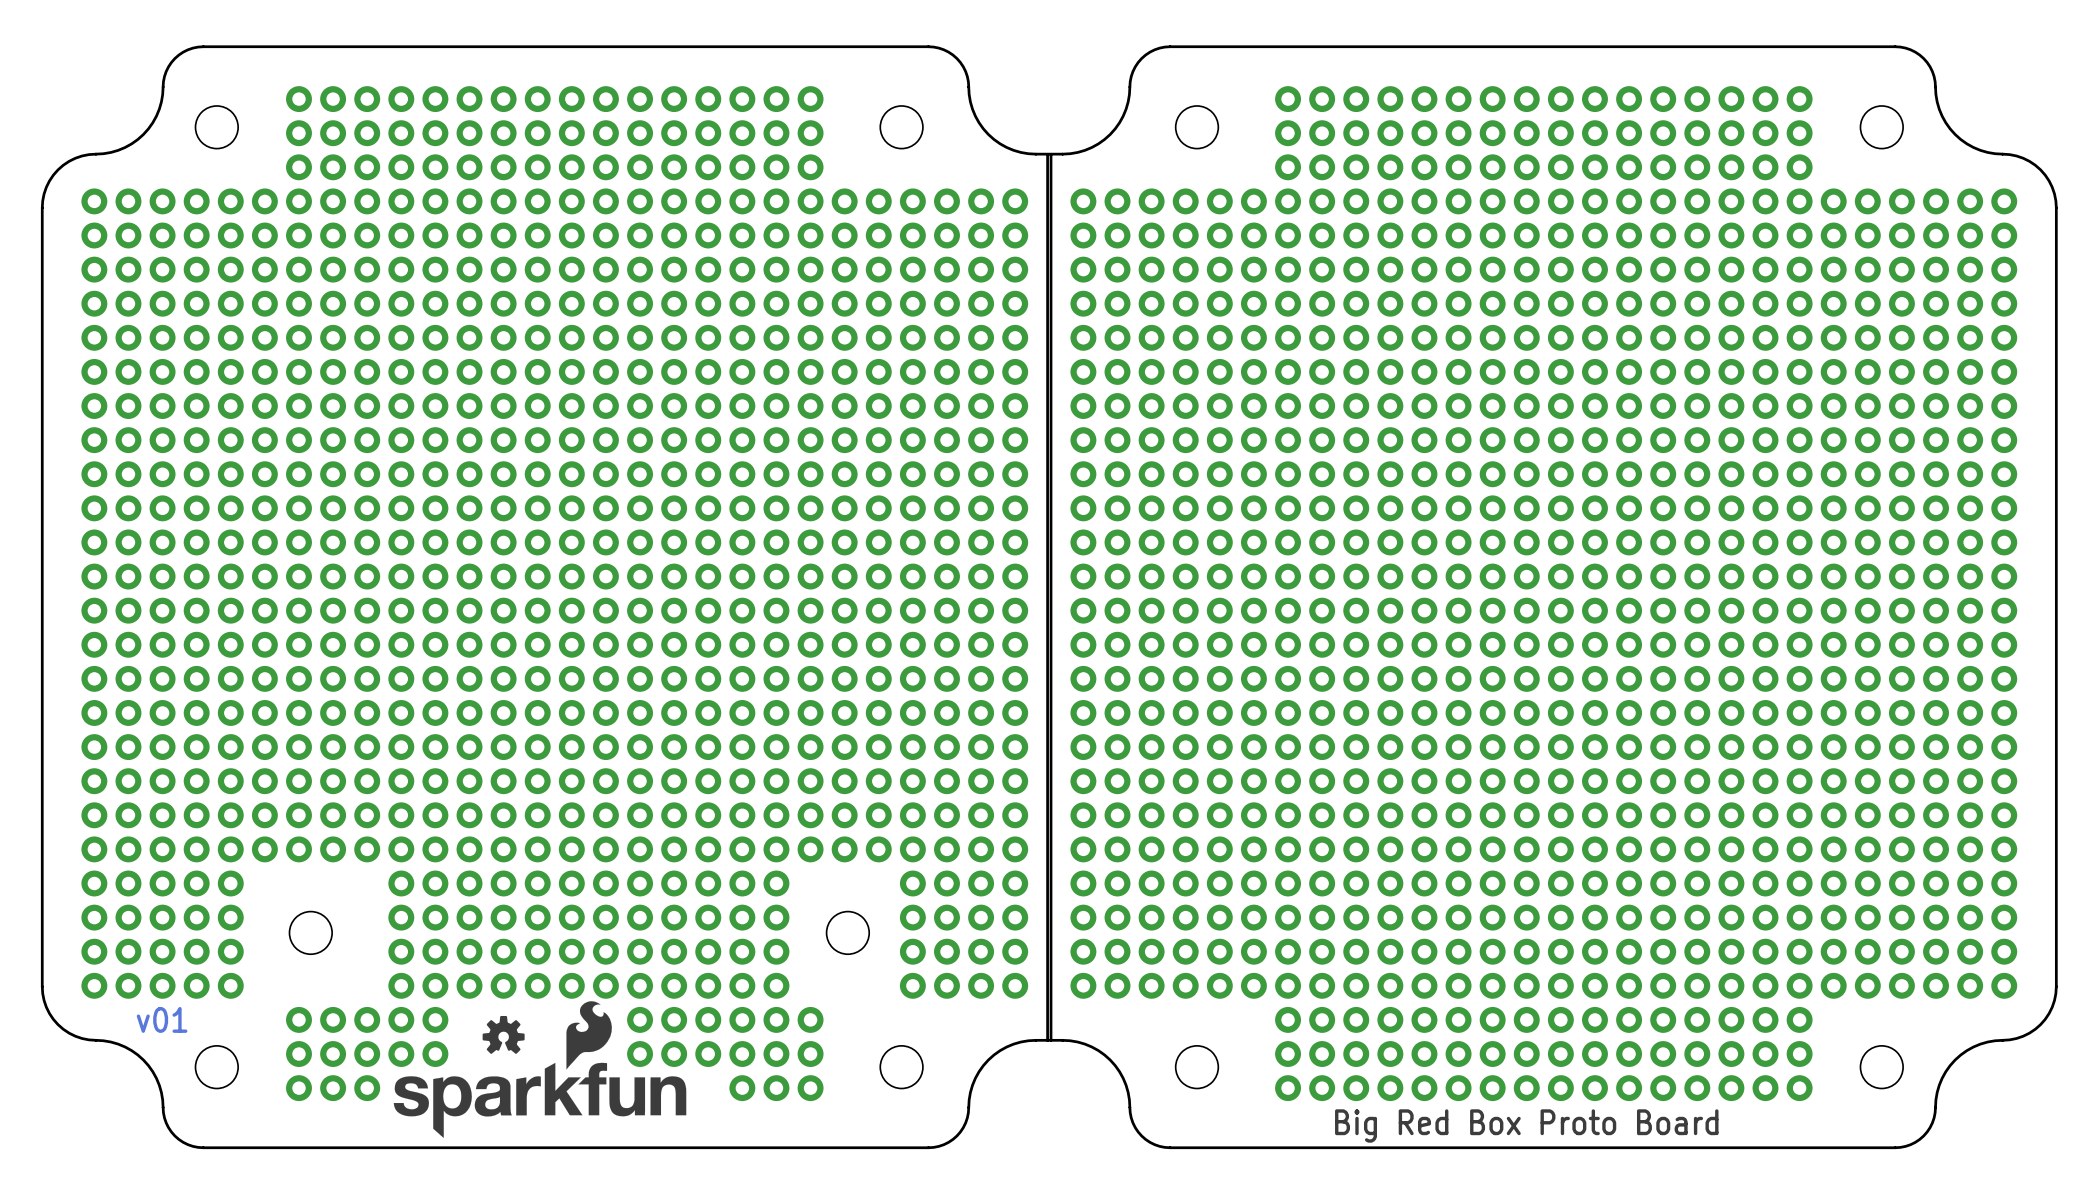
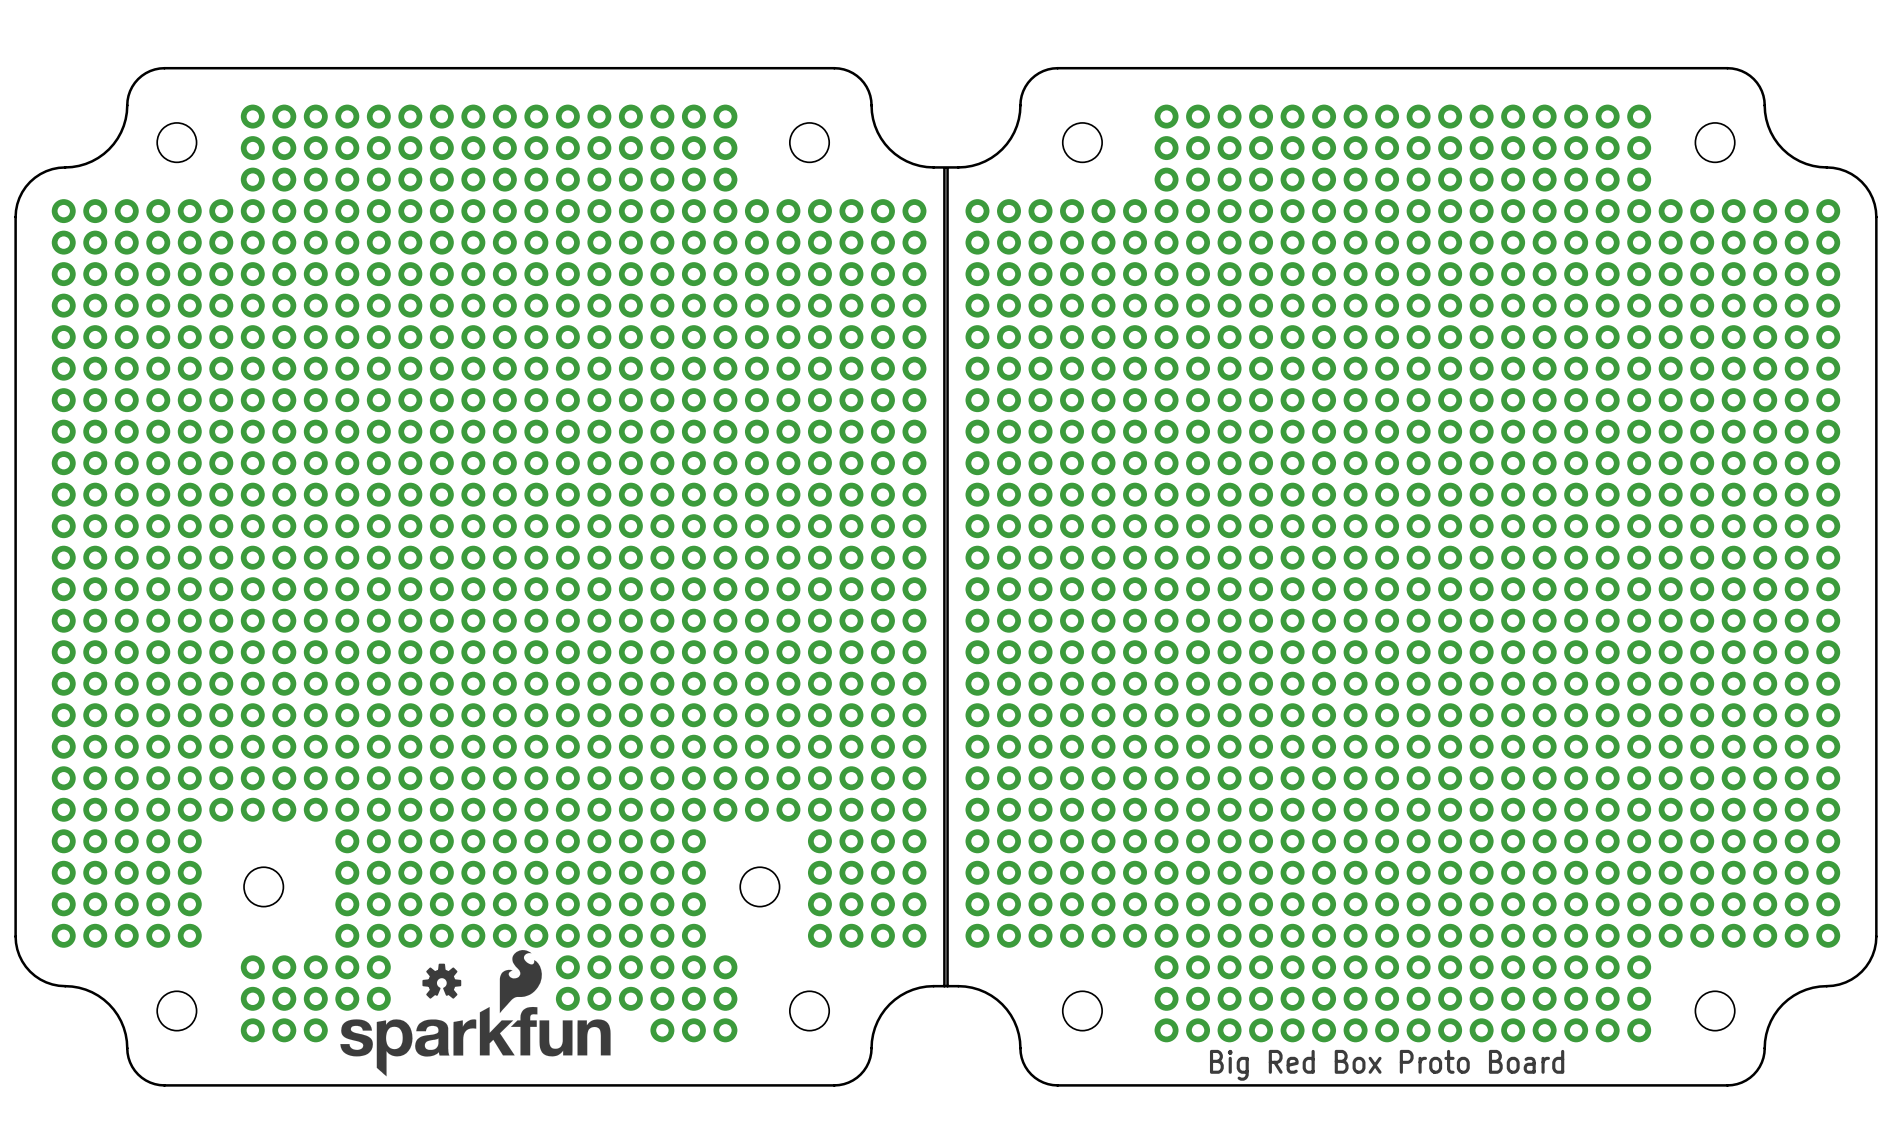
text: v01 (162, 1019) -> none

